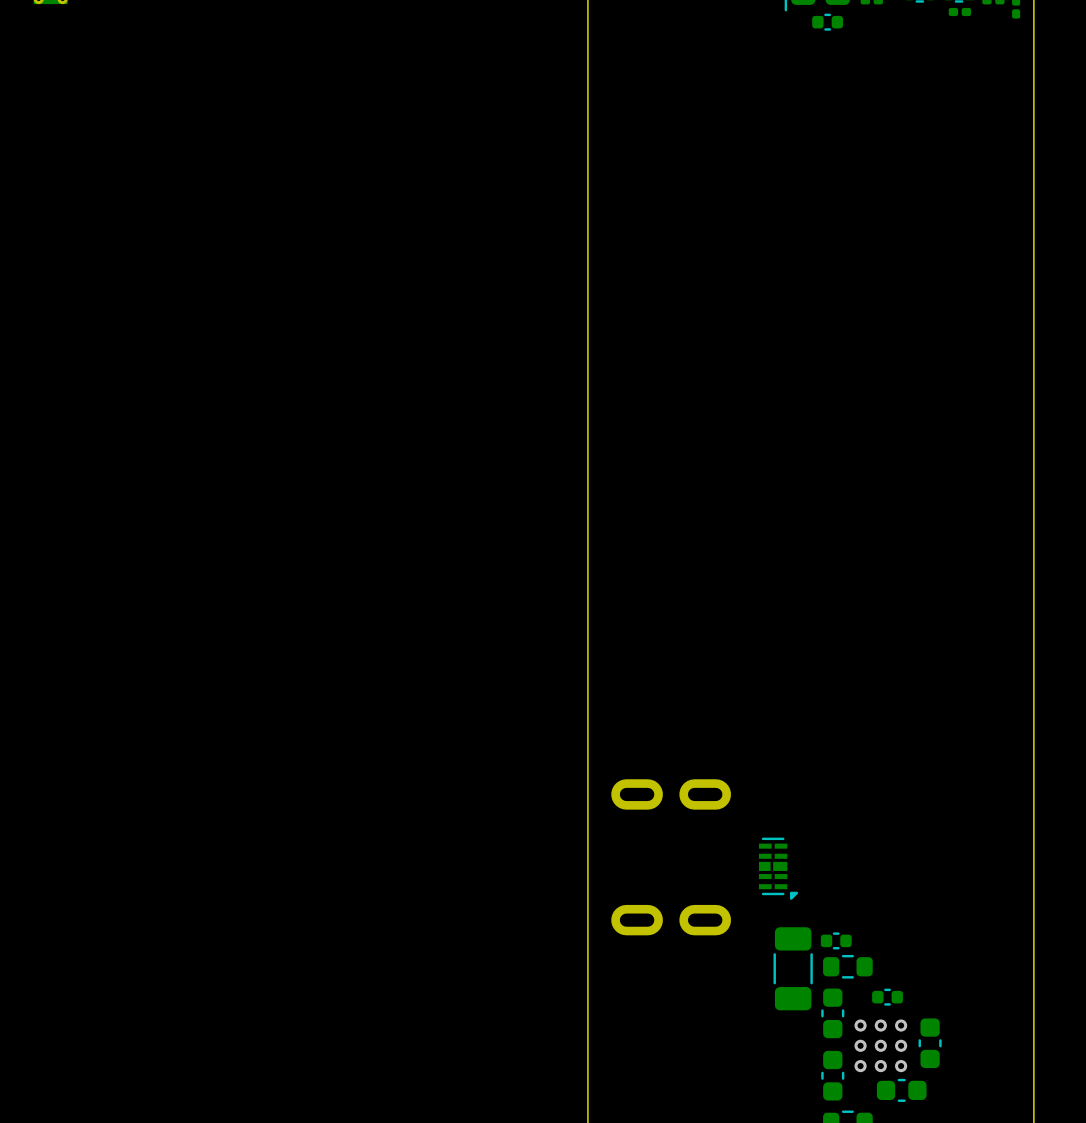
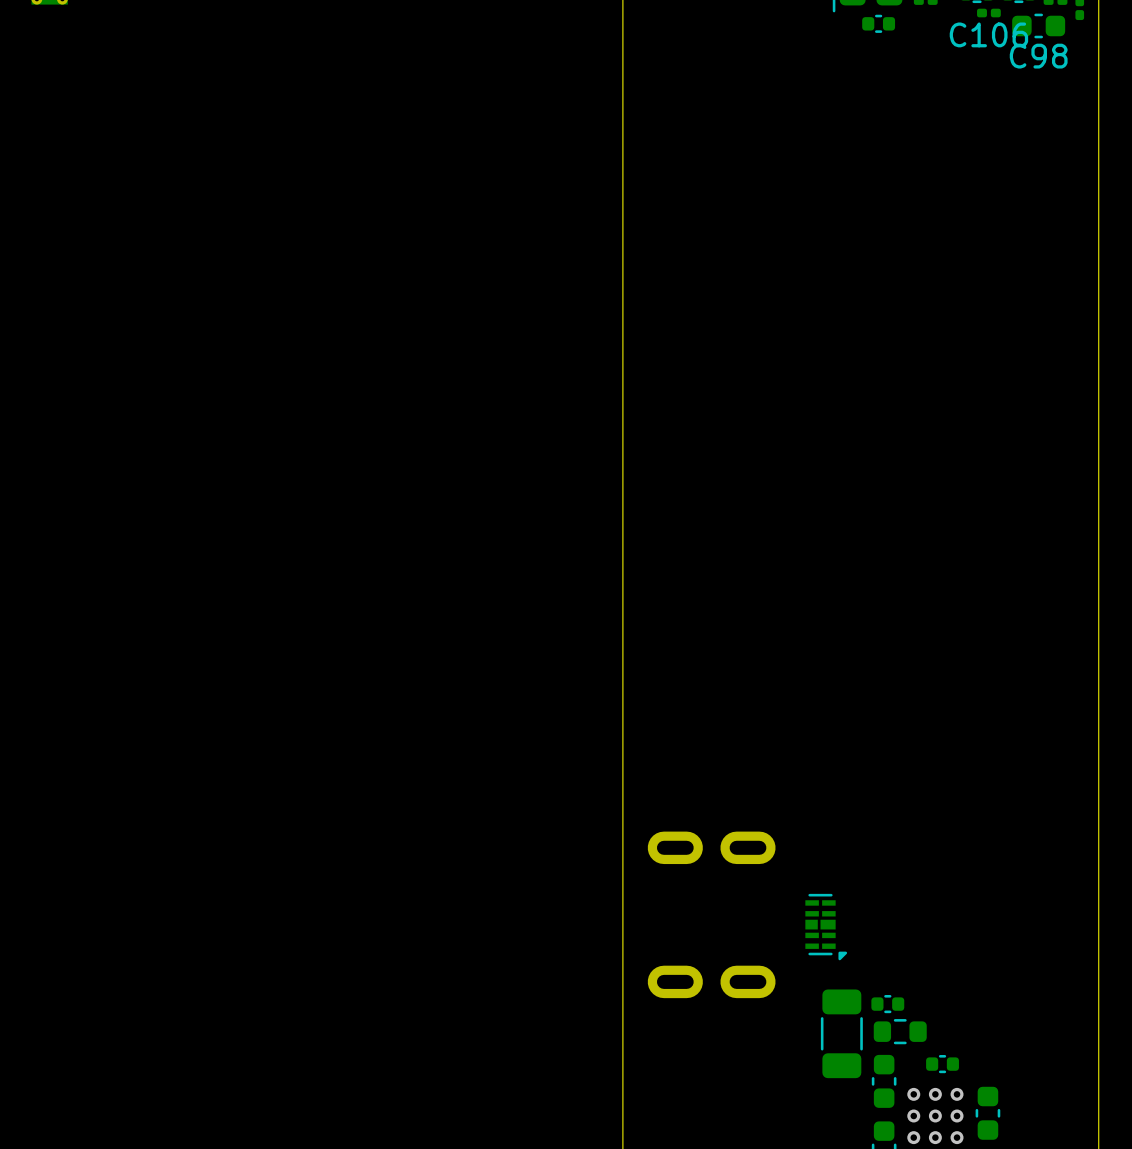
C106: none -> (988, 13)
part: (959, 12) -> none
C98: none -> (1038, 25)

